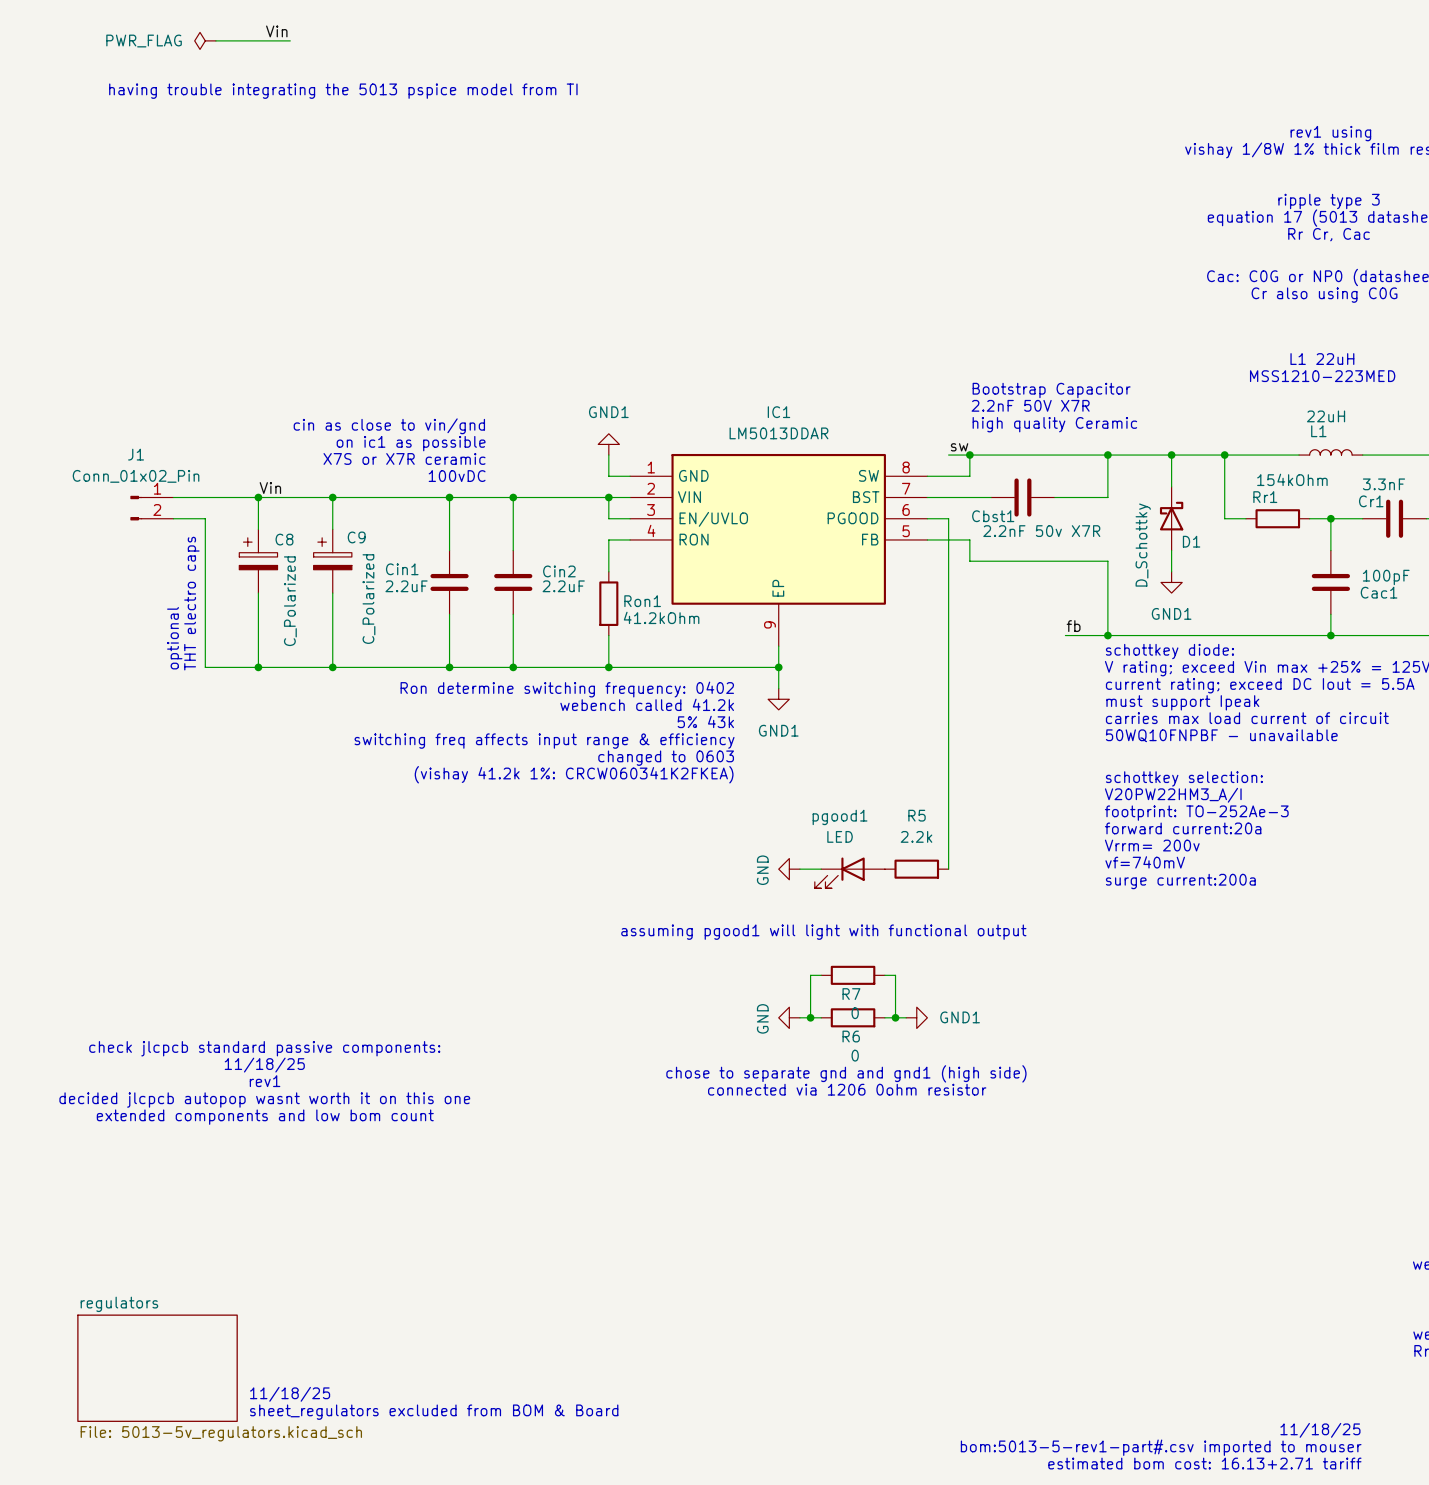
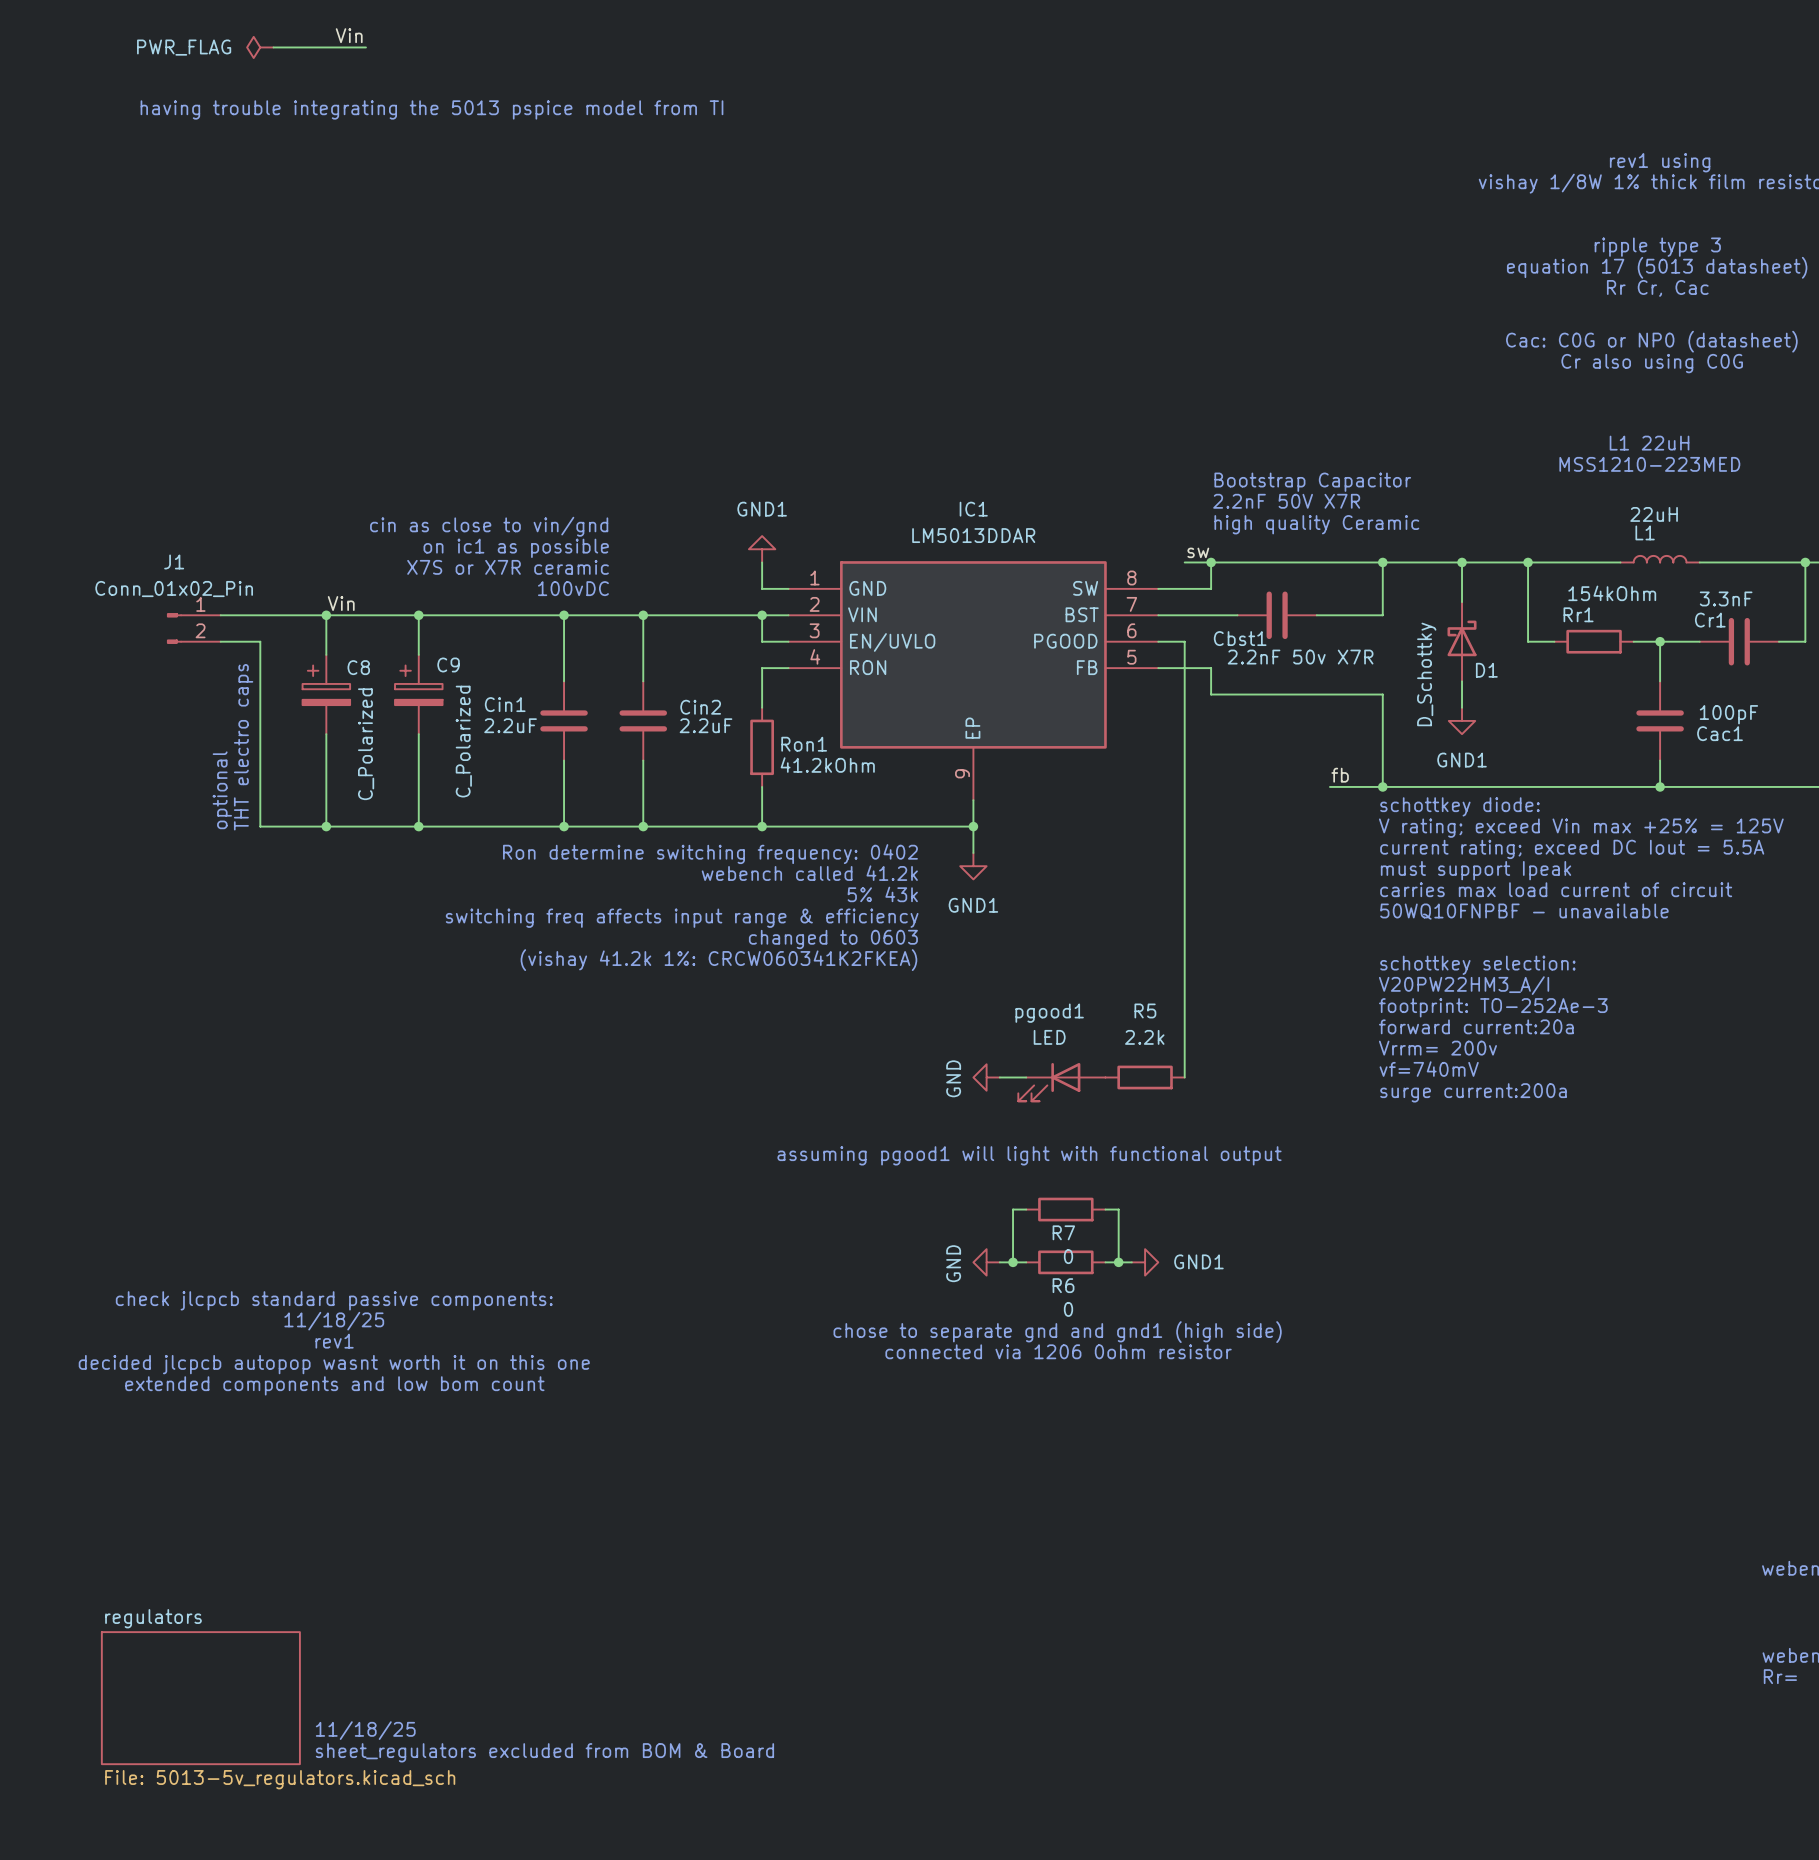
text: 11/18/25 (1320, 1430) -> none
text: bom:5013-5-rev1-part#.csv imported to mouser (1161, 1447) -> none
text: estimated bom cost: 16.13+2.71 tariff (1204, 1463) -> none

